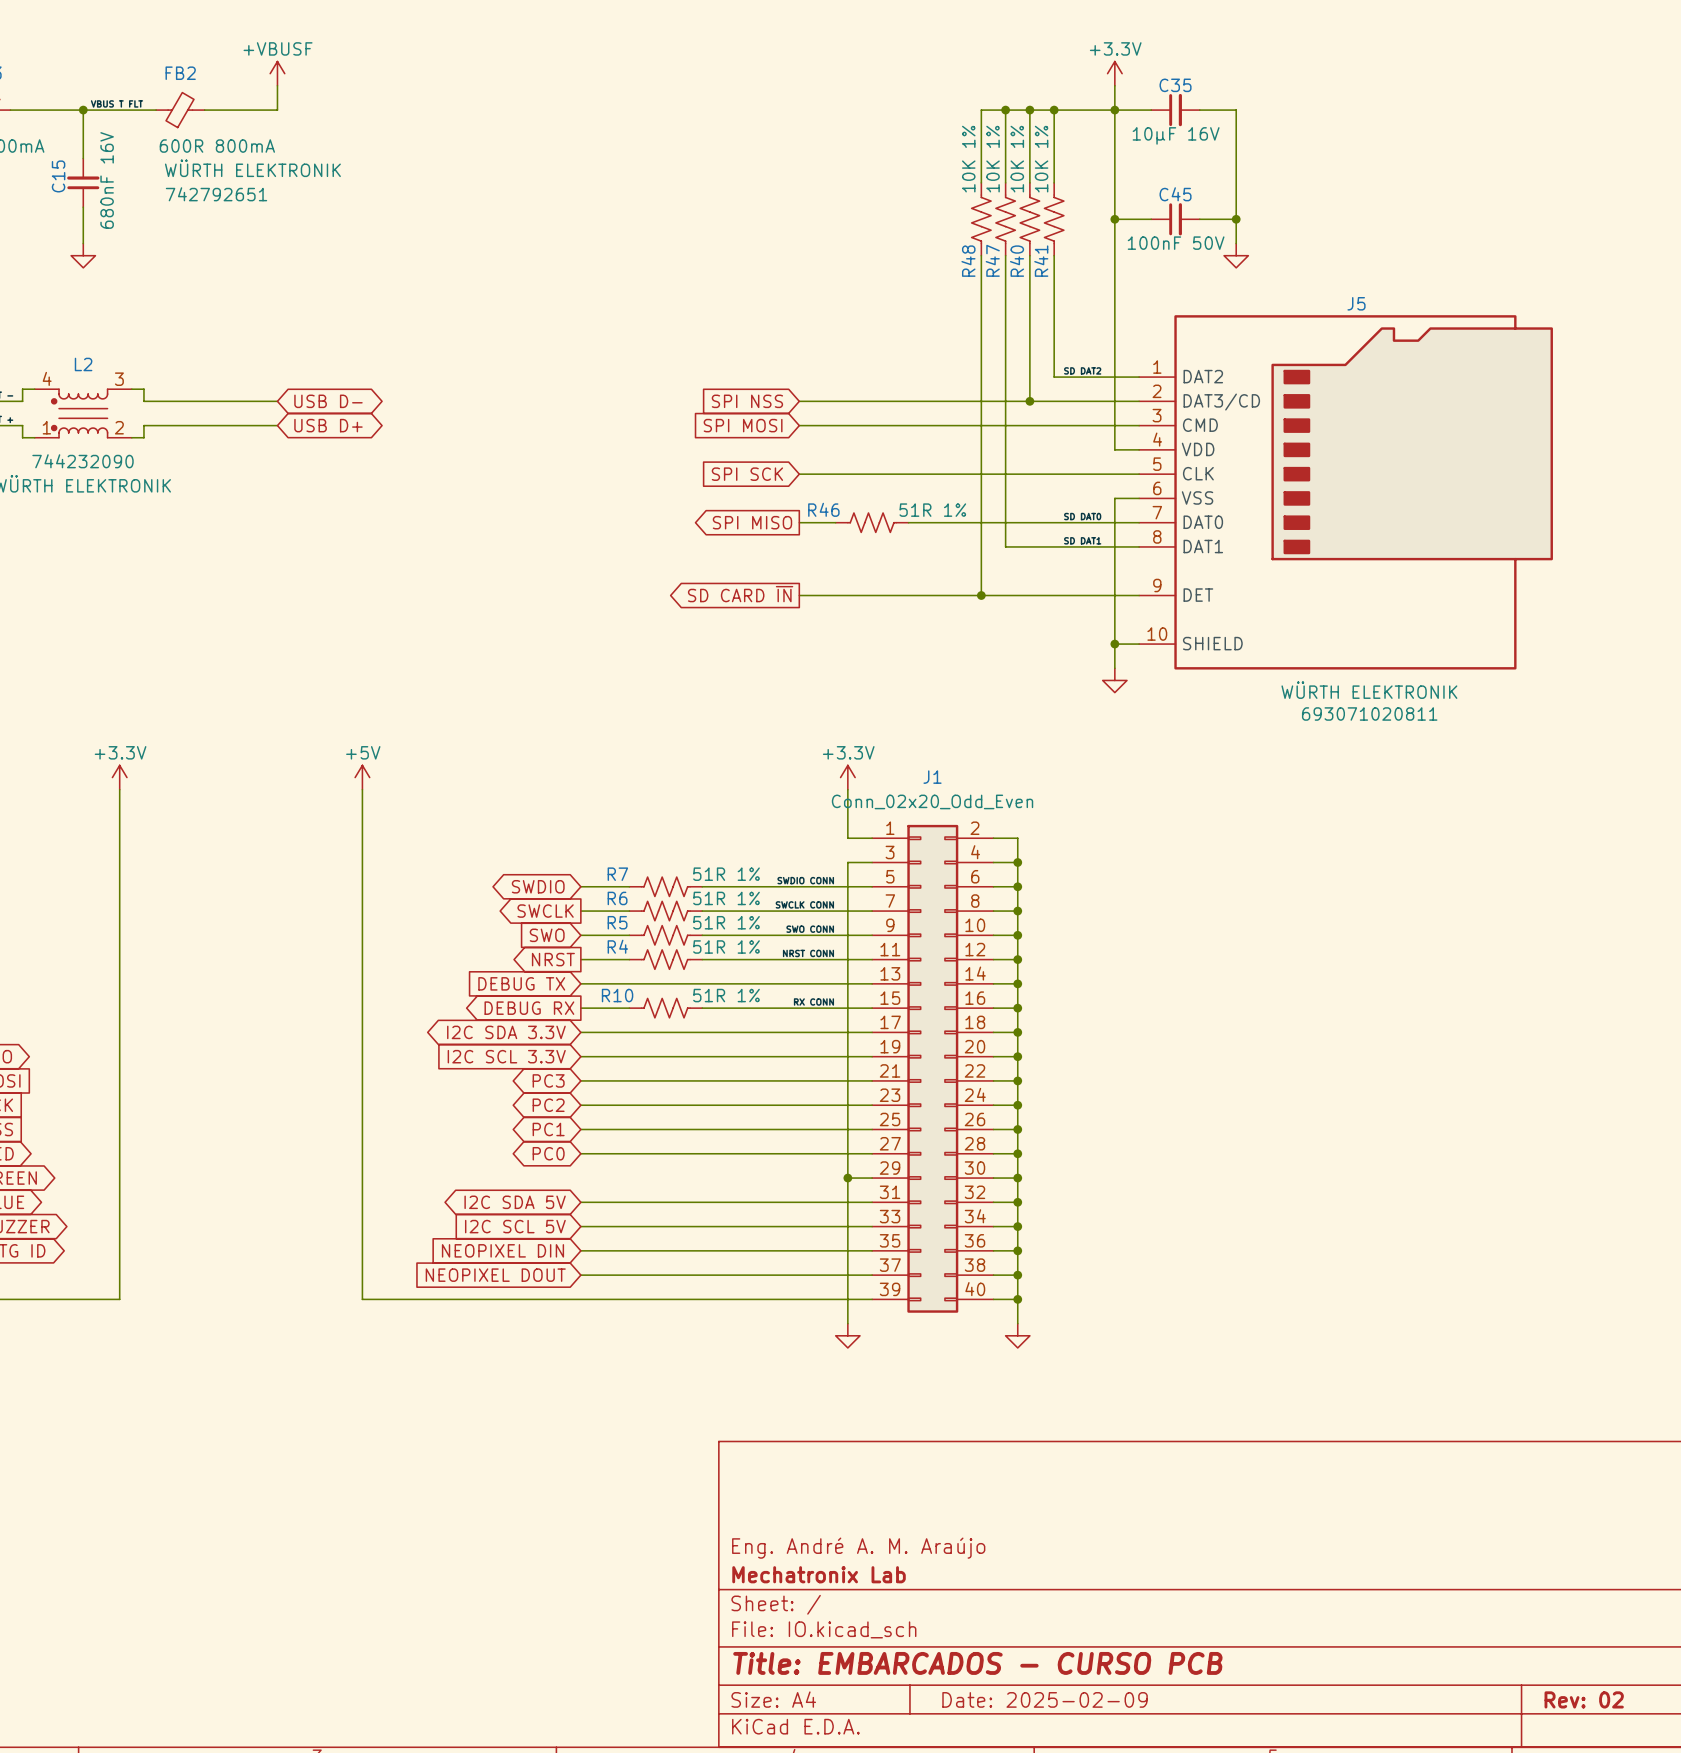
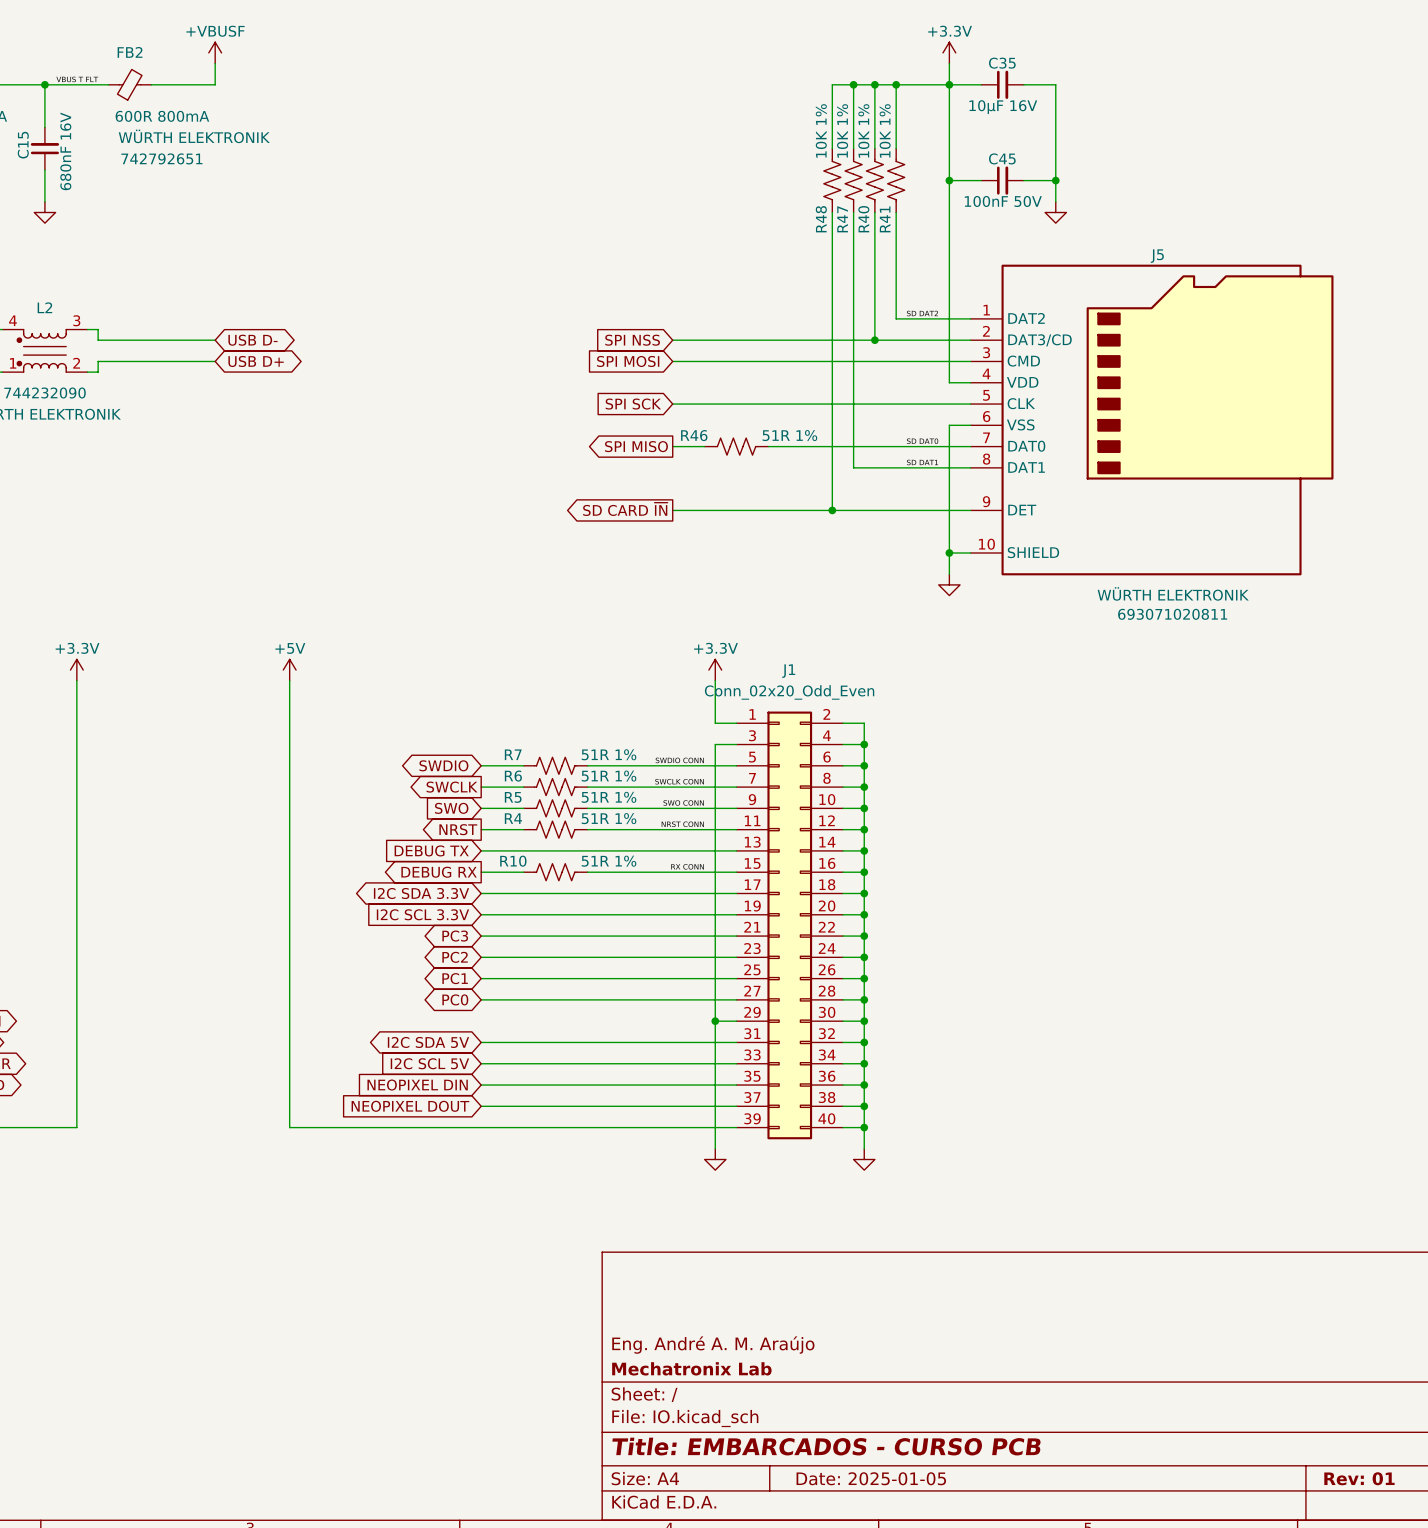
title block: Date: 2025-02-09 (1045, 1699) -> Date: 2025-01-05 (871, 1478)
title block: Rev: 02 (1584, 1699) -> Rev: 01 (1359, 1478)

